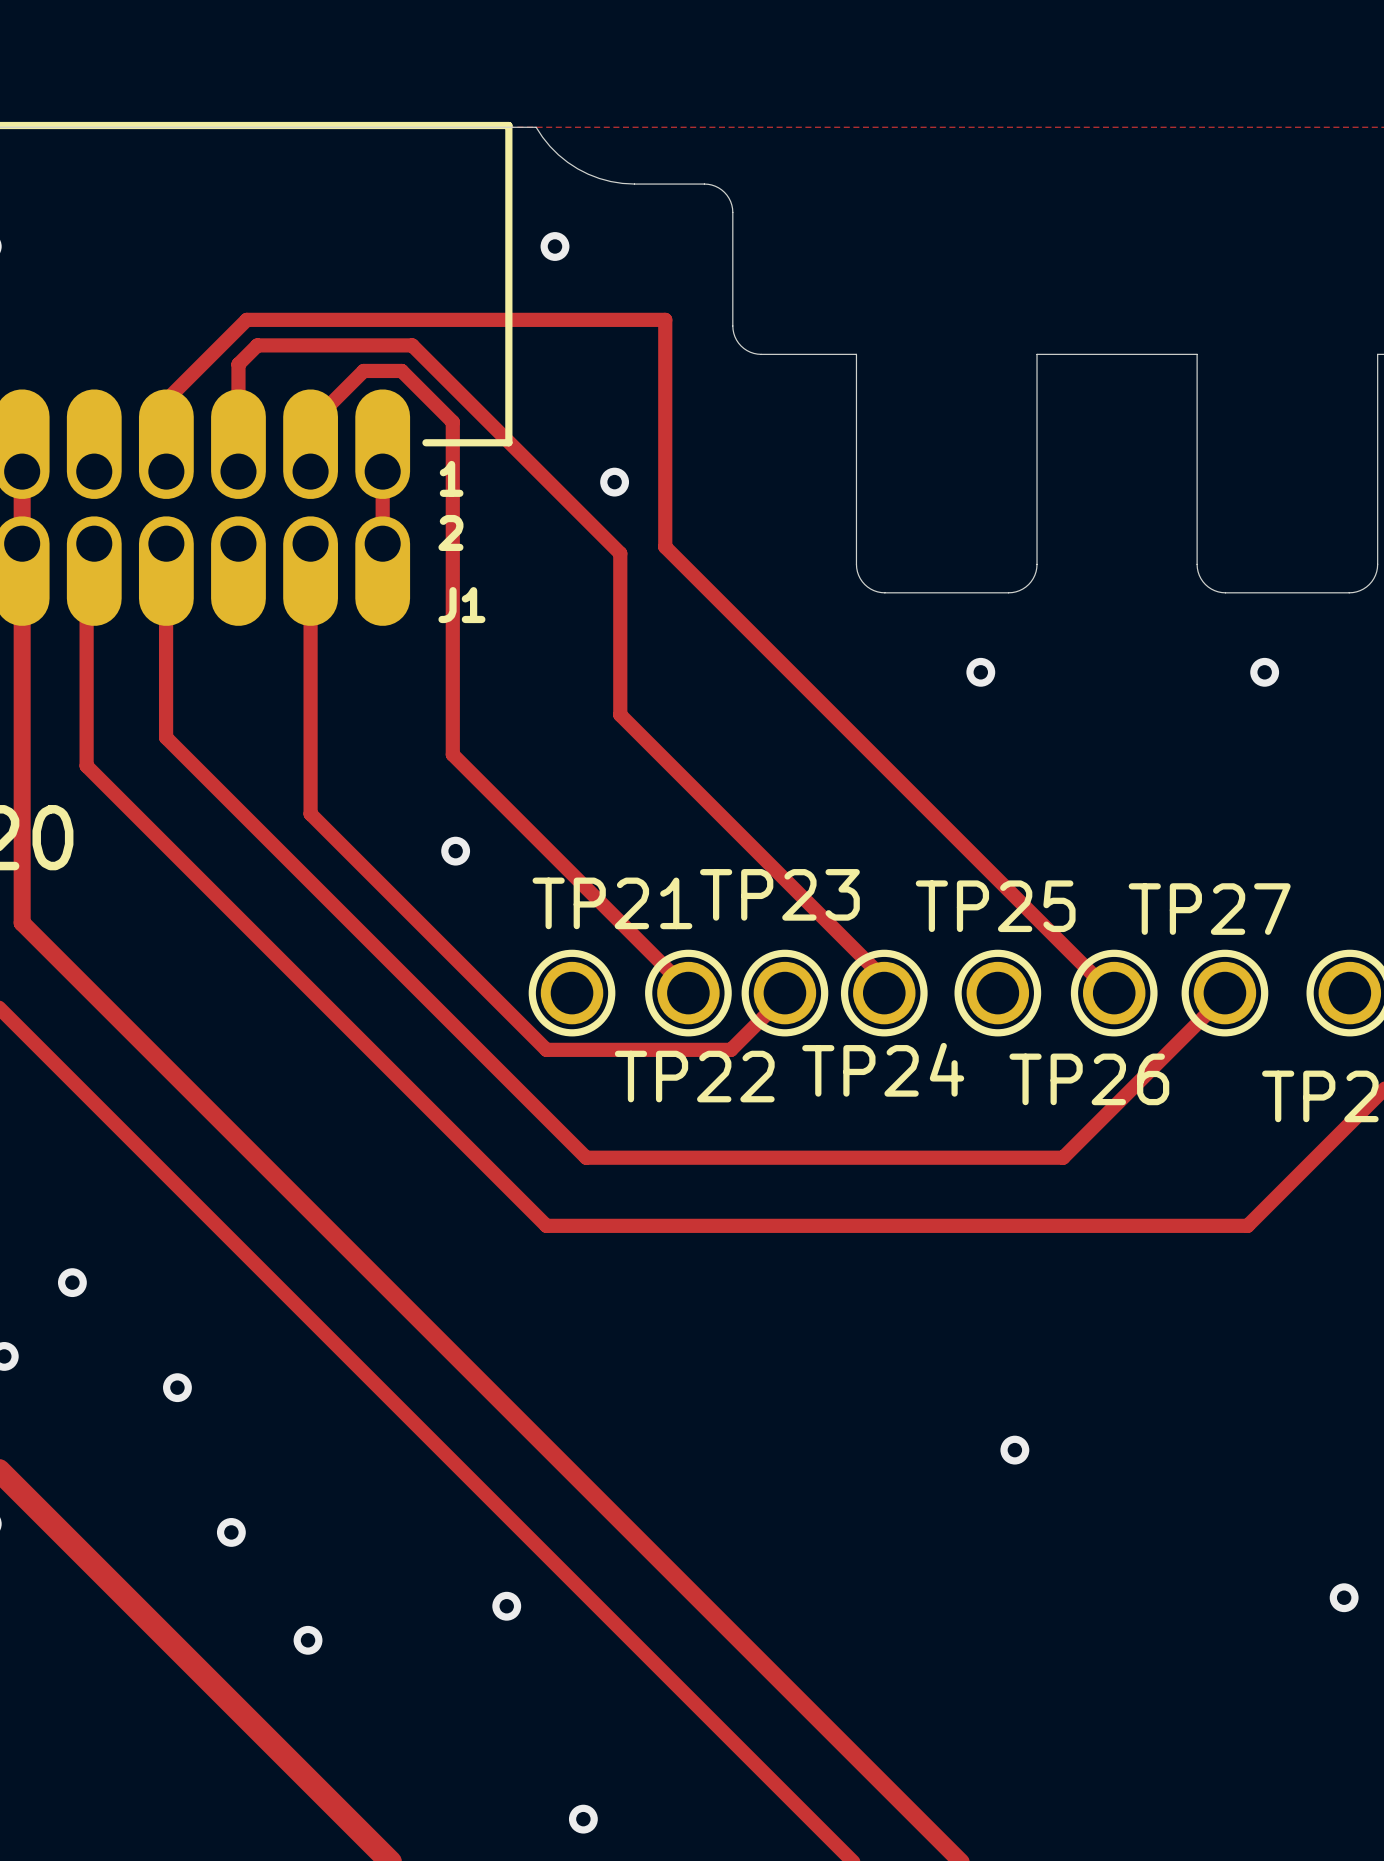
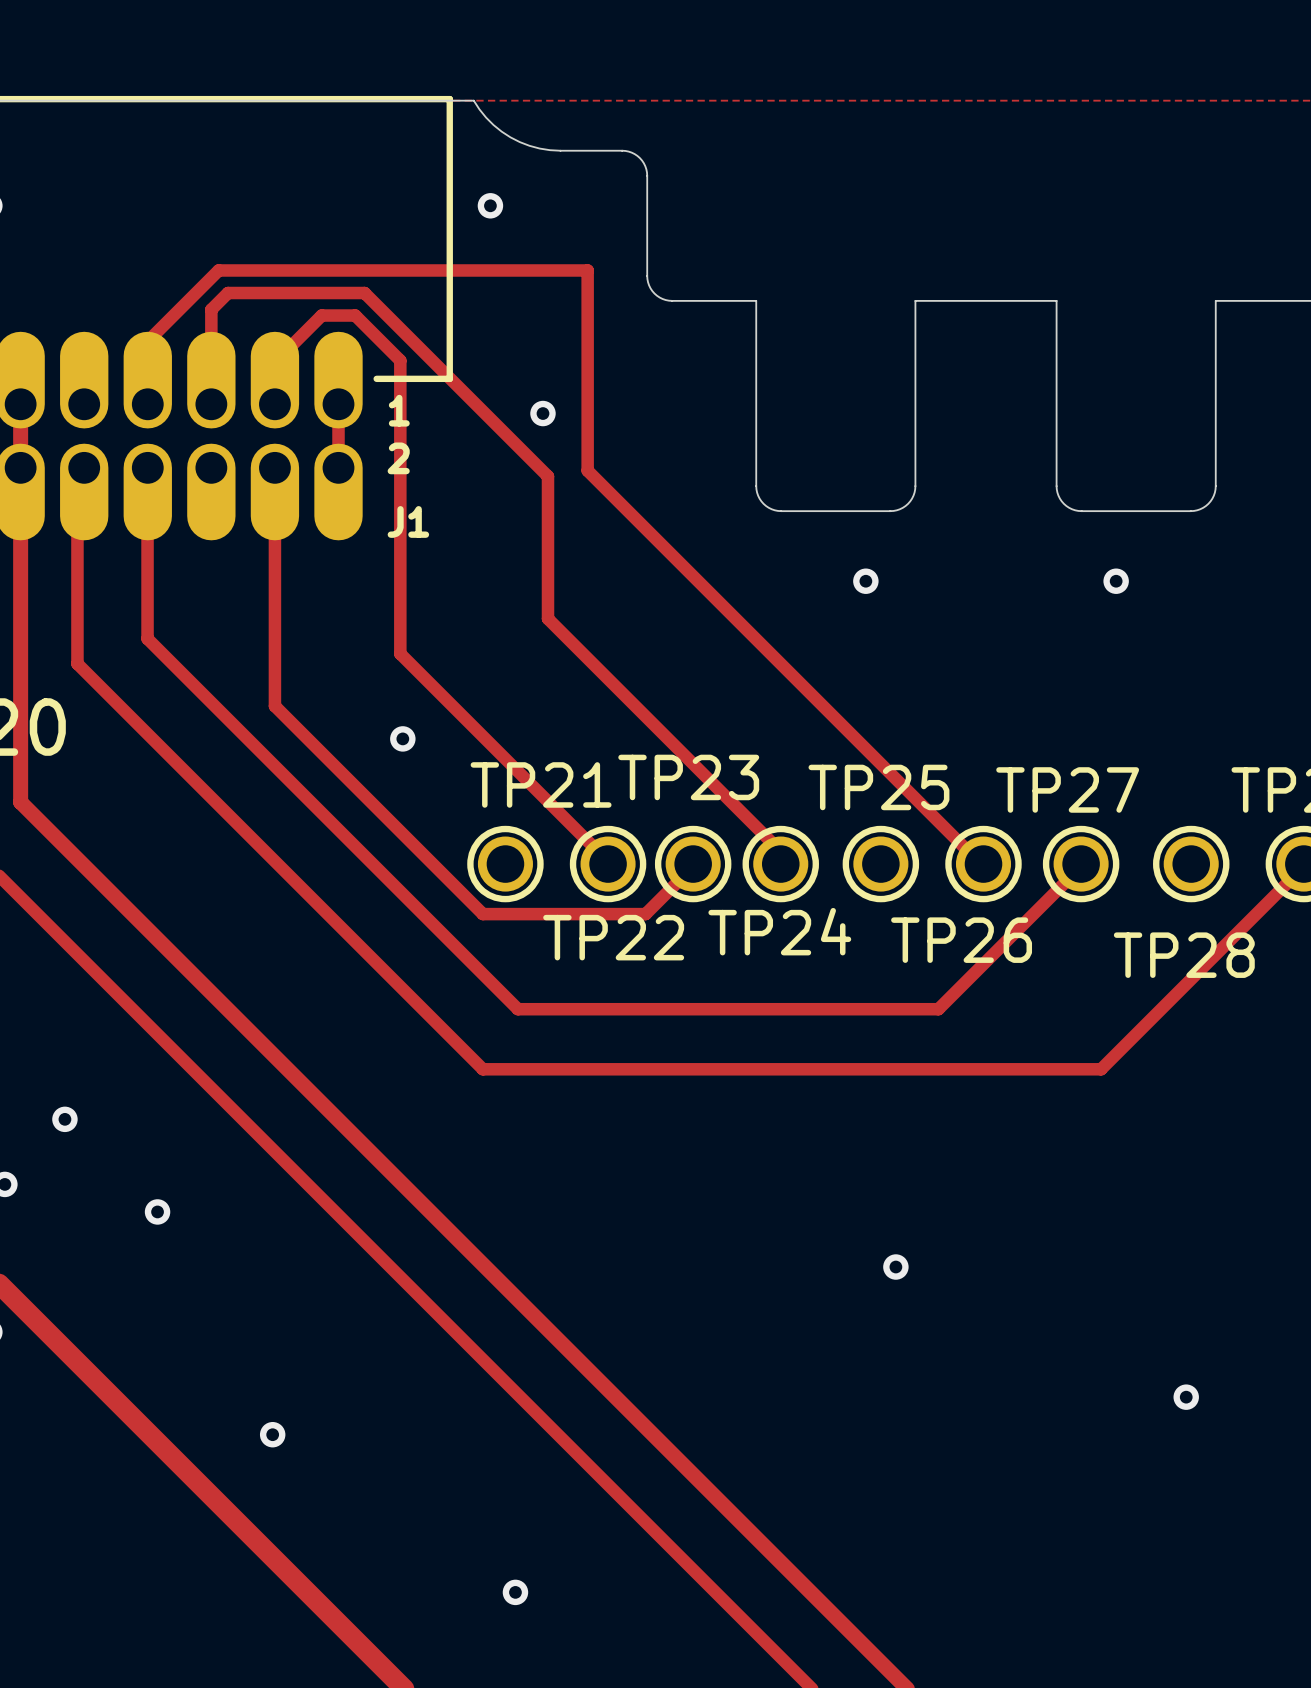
via: (231, 1532) -> none
via: (506, 1606) -> none

